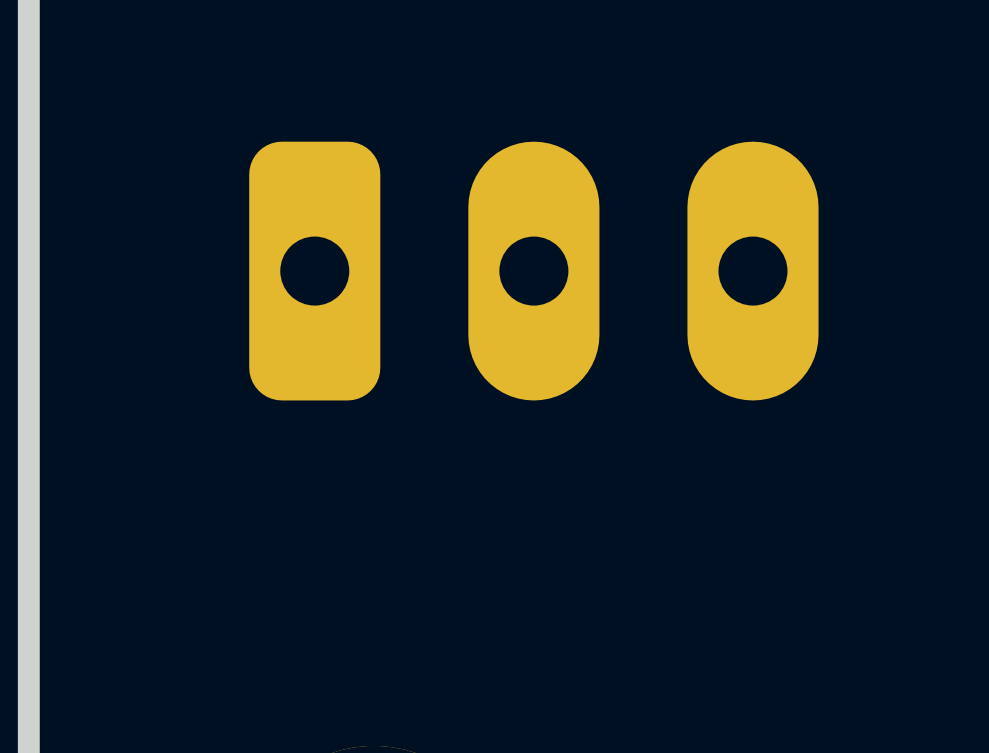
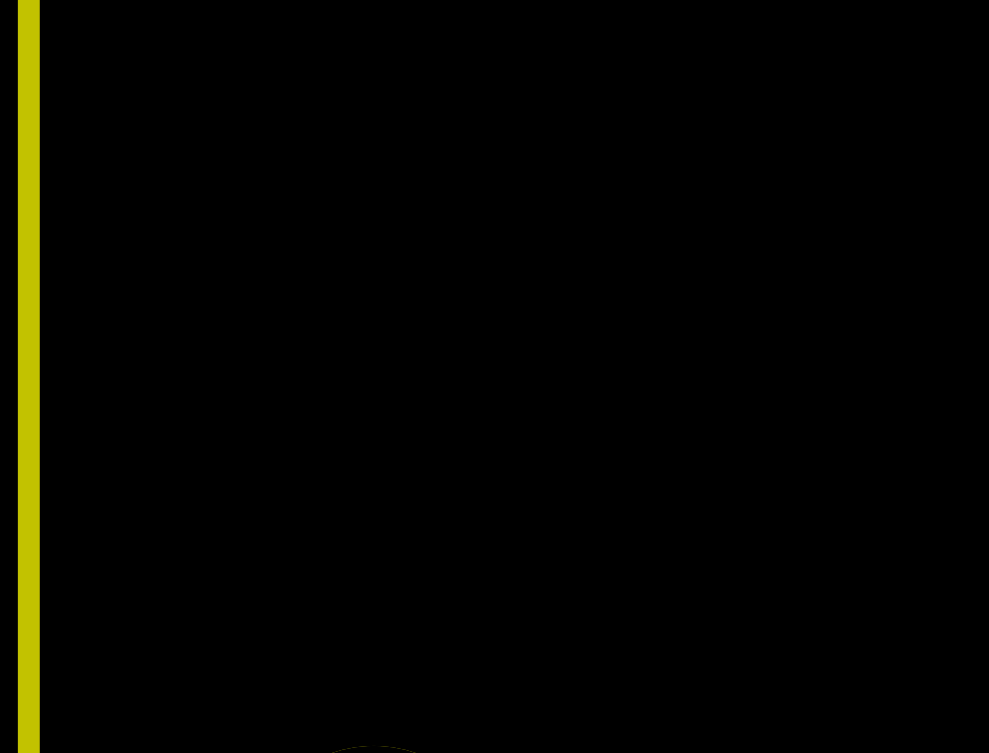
part: (533, 271) -> none

